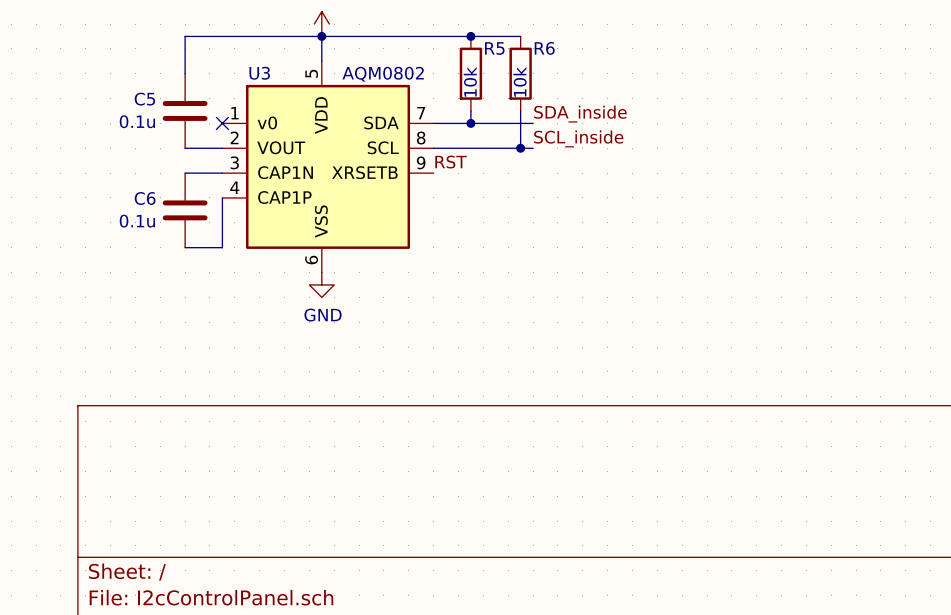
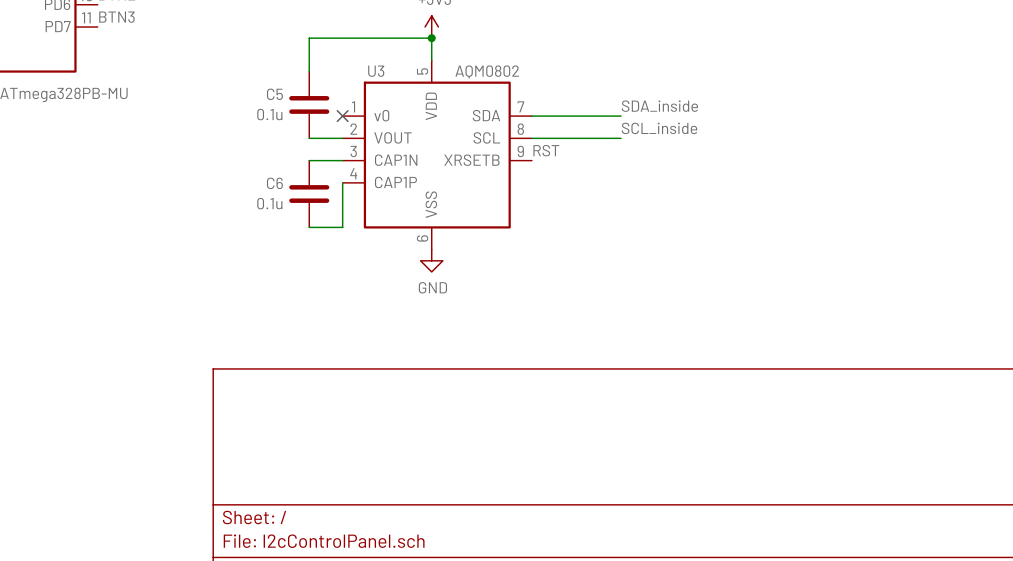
wire: (321, 36) (520, 36) -> none
junction: (470, 36) -> none
R5: 10k (470, 73) -> none
R6: 10k (520, 73) -> none
wire: (470, 110) (470, 123) -> none
wire: (520, 110) (520, 148) -> none
junction: (470, 123) -> none
junction: (520, 148) -> none

